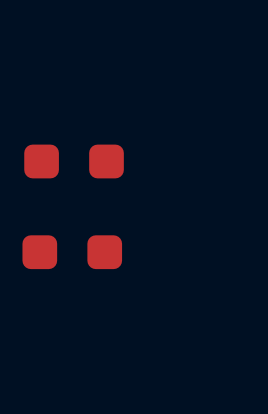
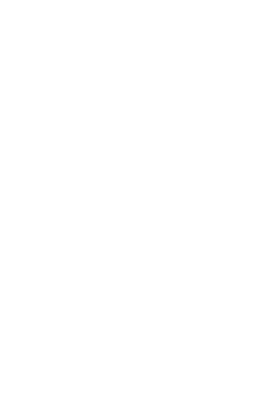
part: (74, 161) -> none
part: (72, 252) -> none

